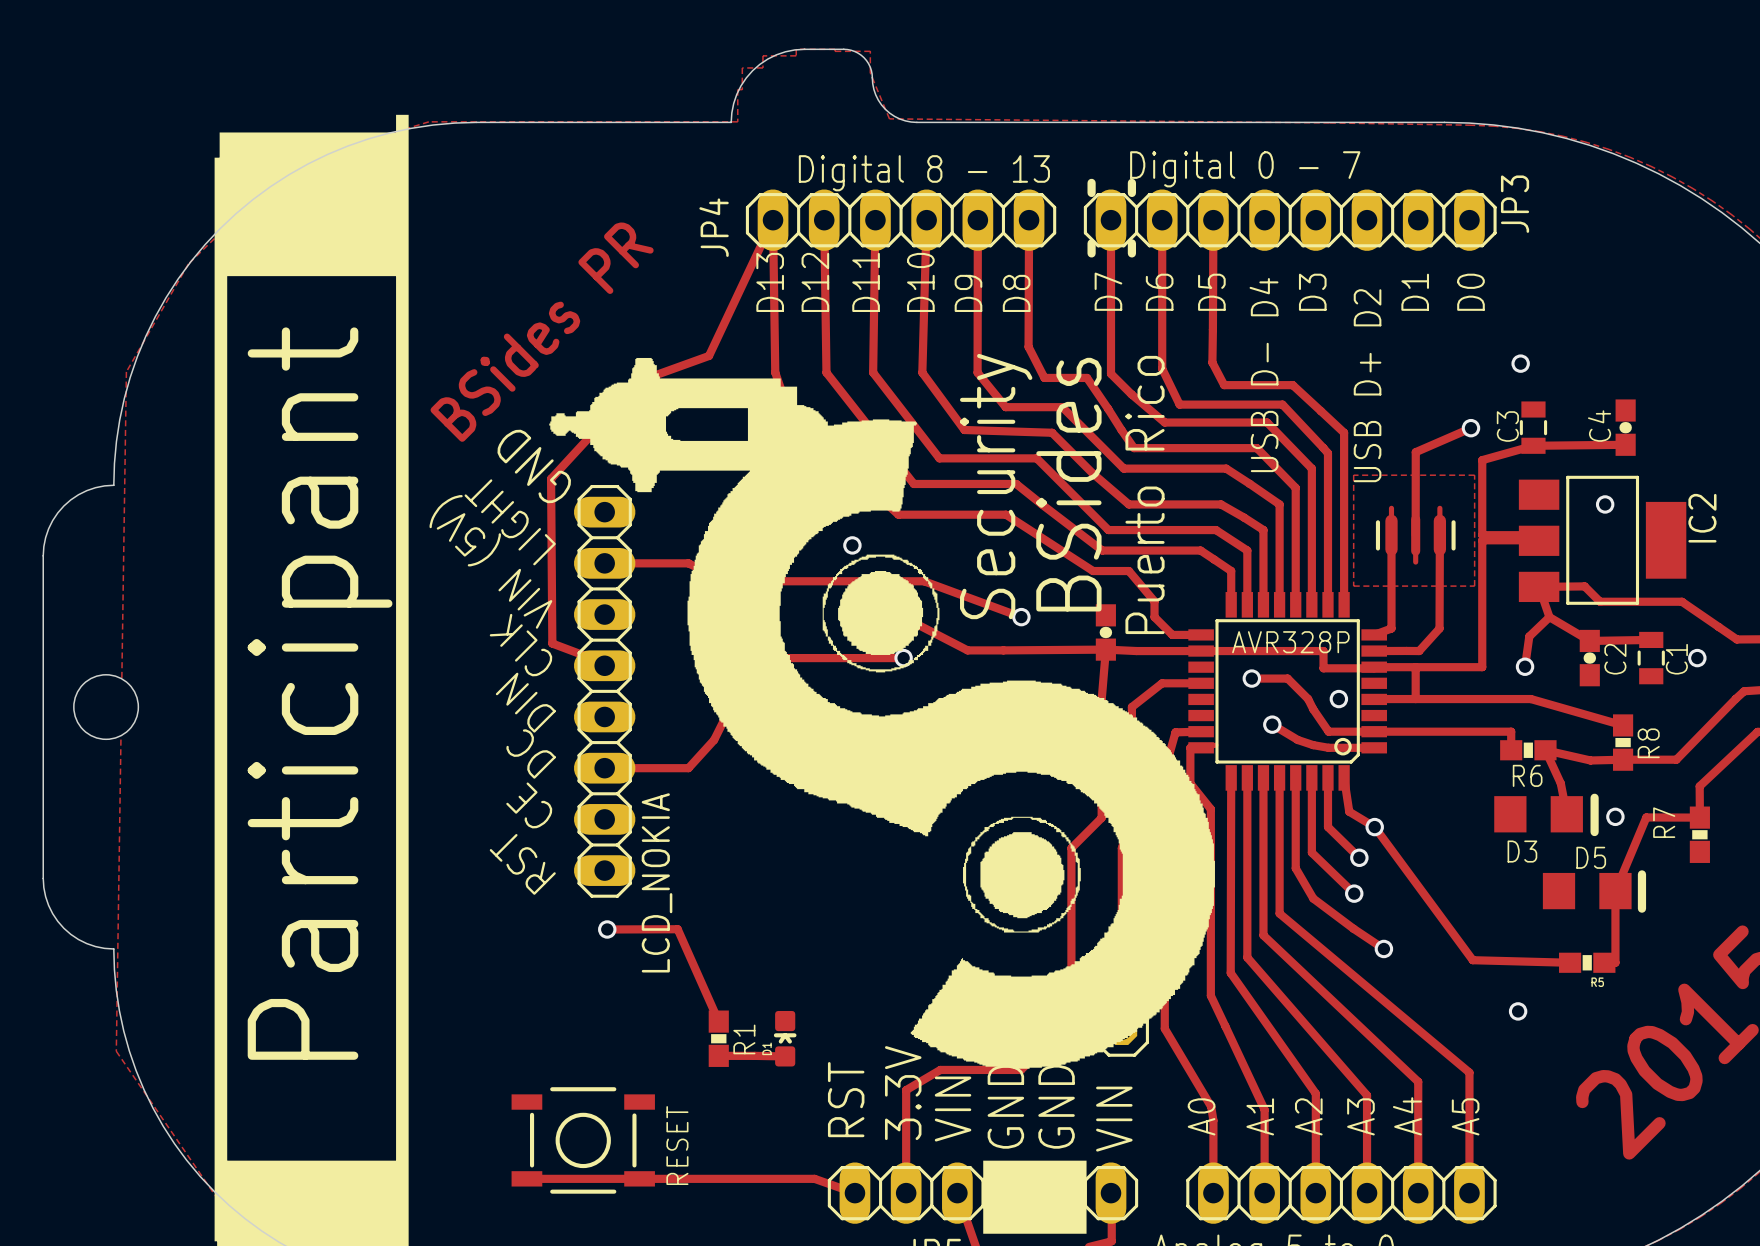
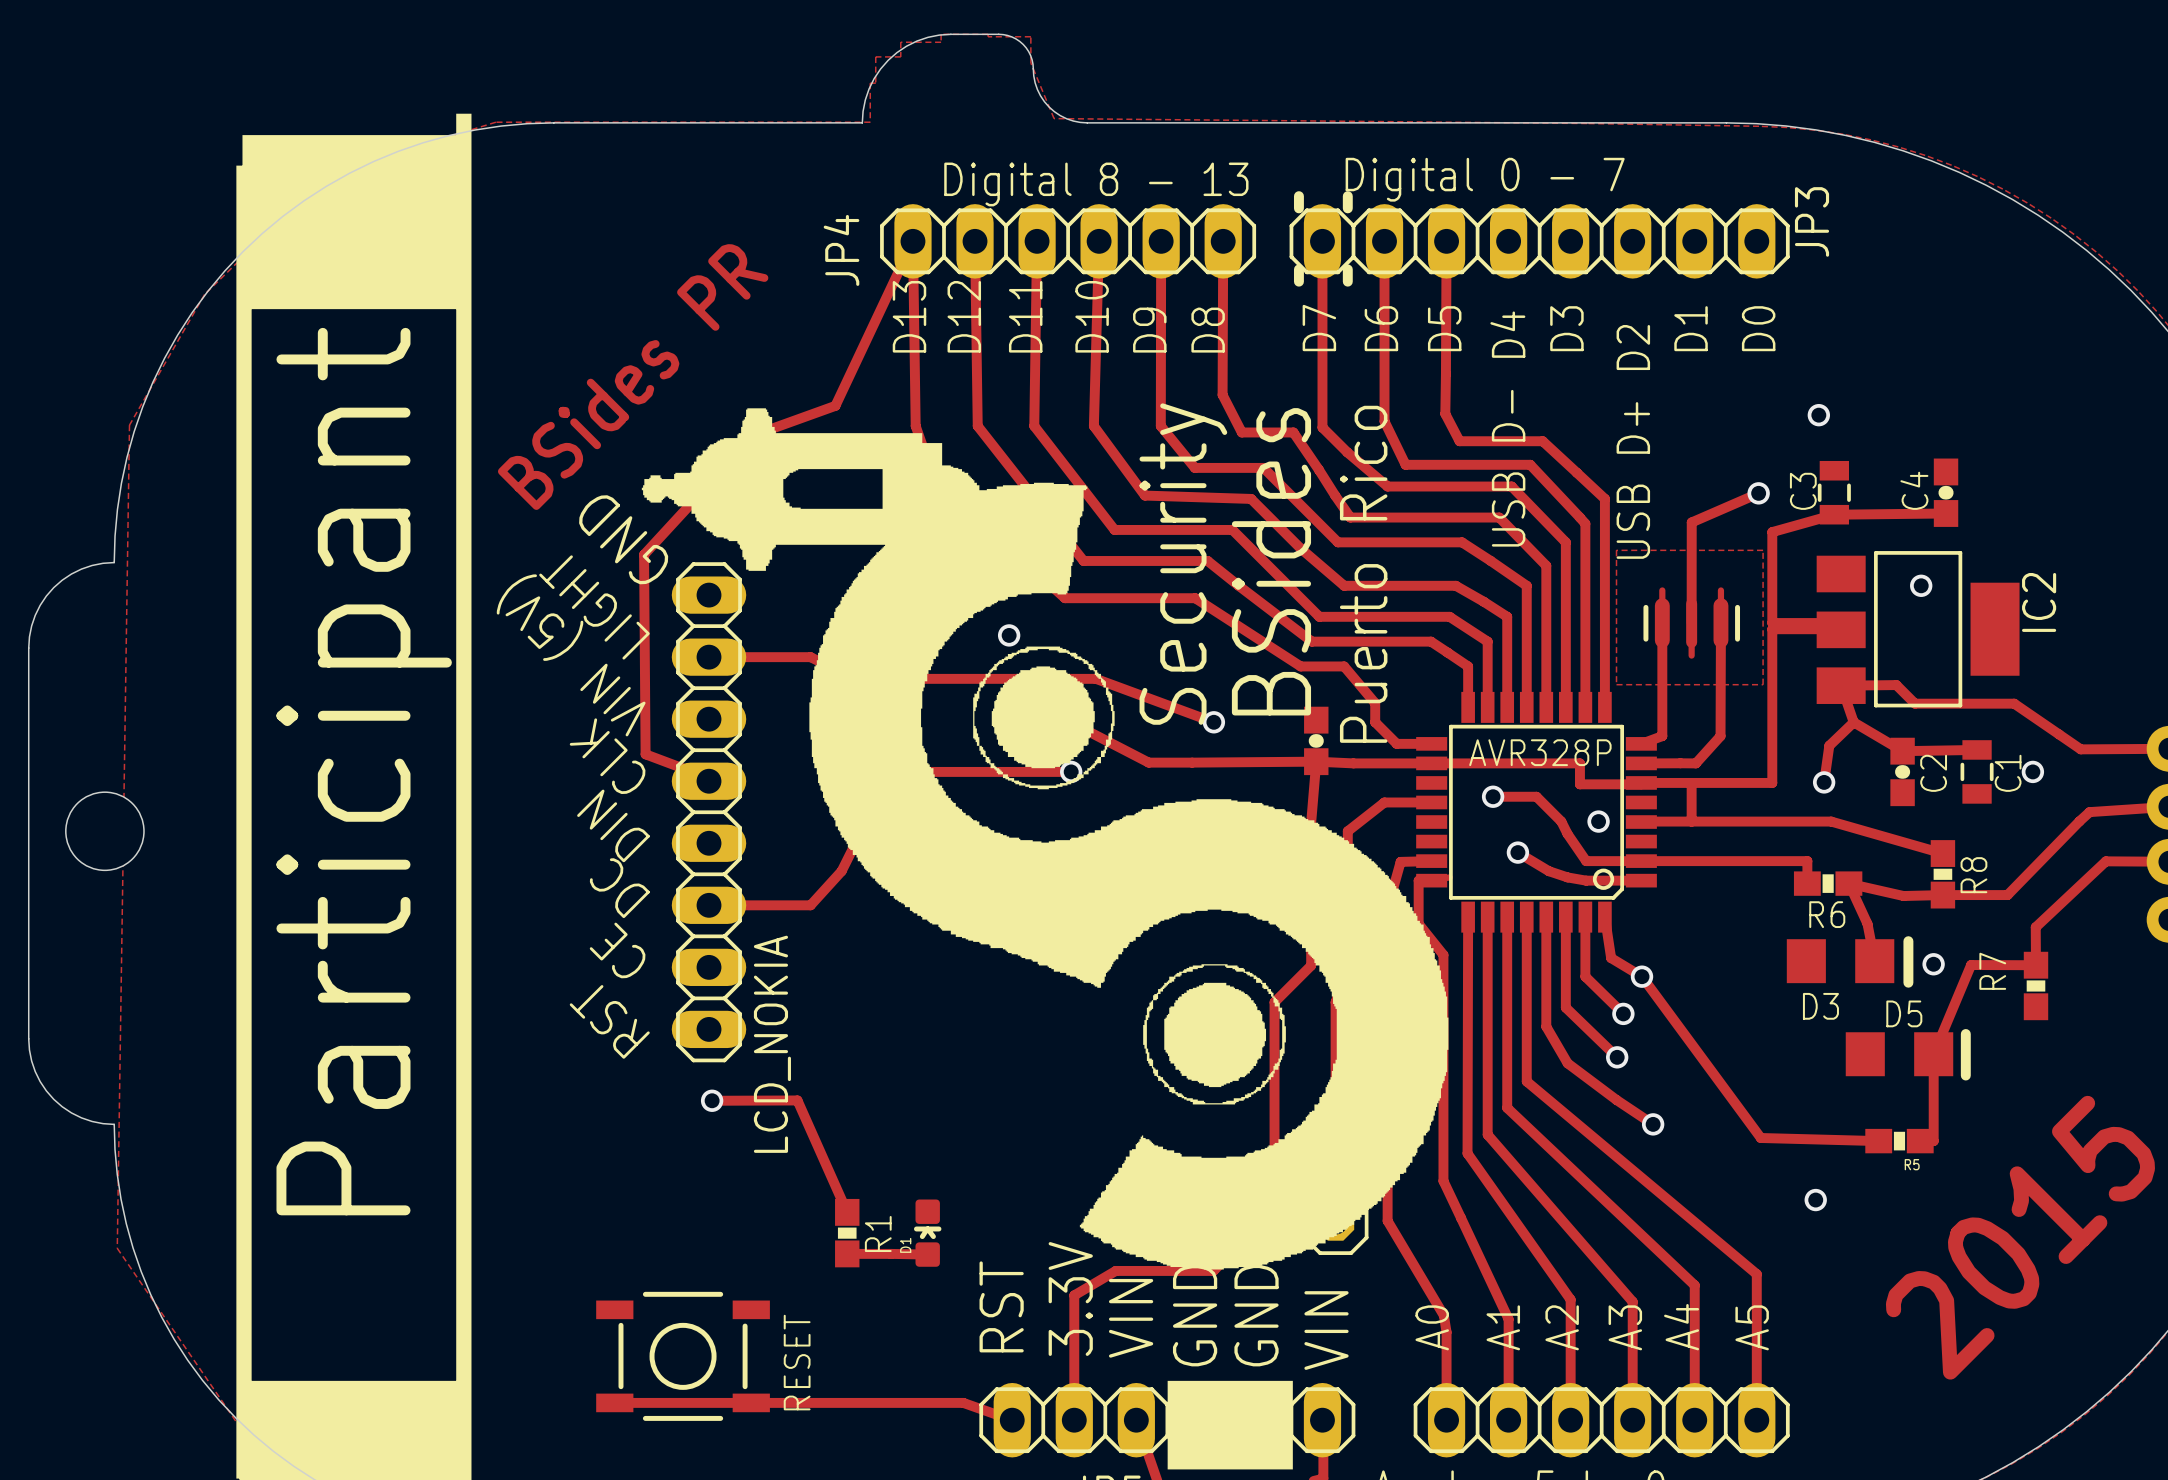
text position: Participant (320, 693) -> Participant (364, 771)

